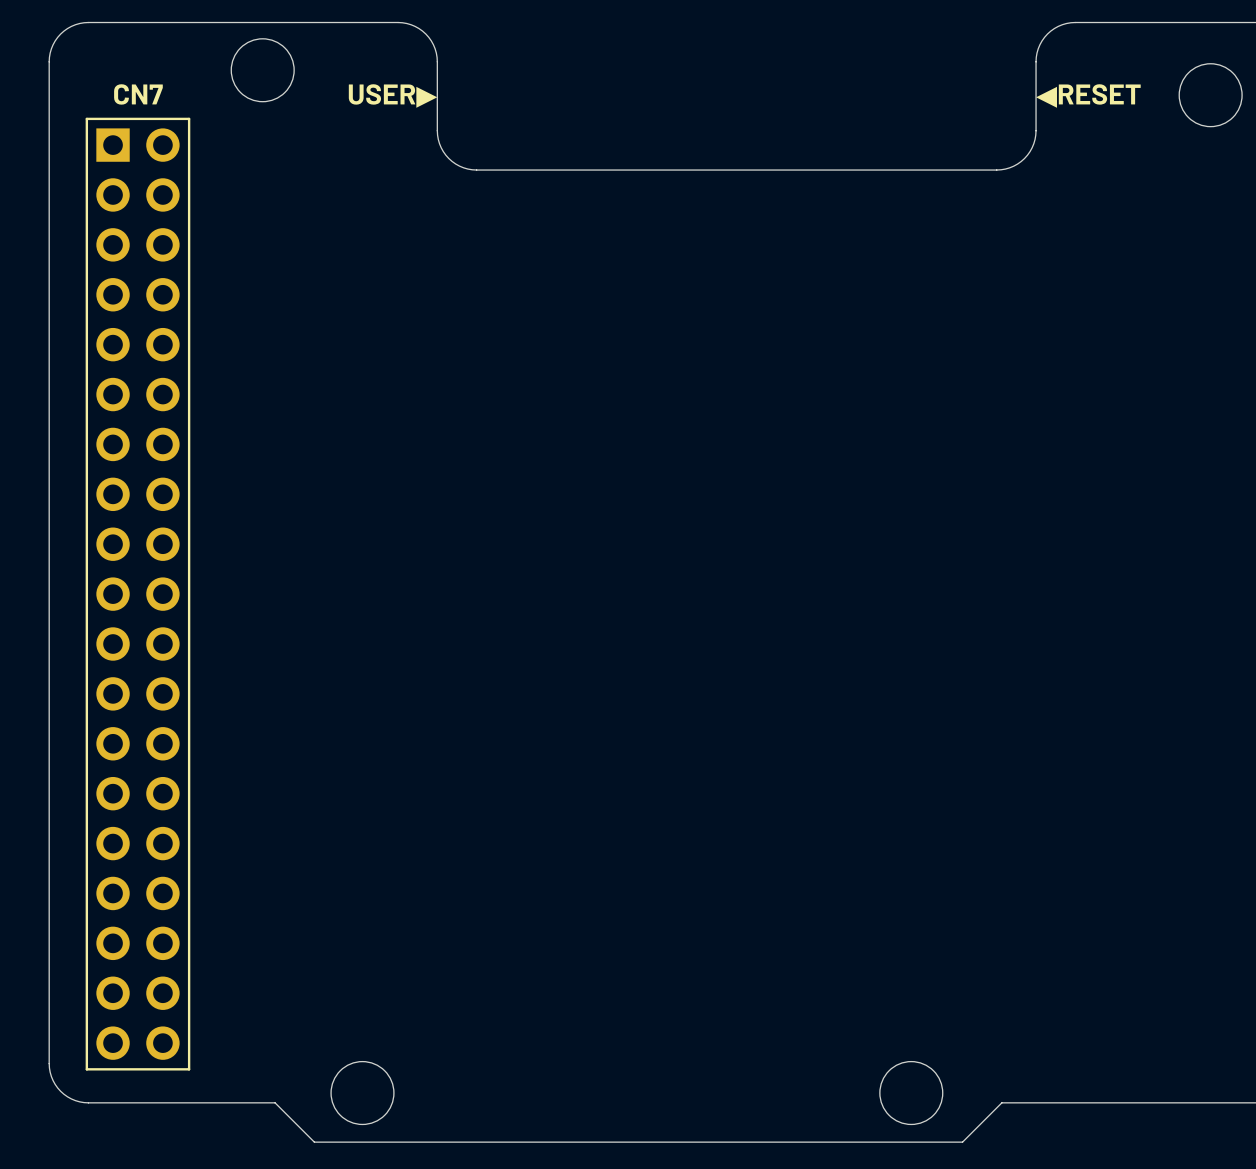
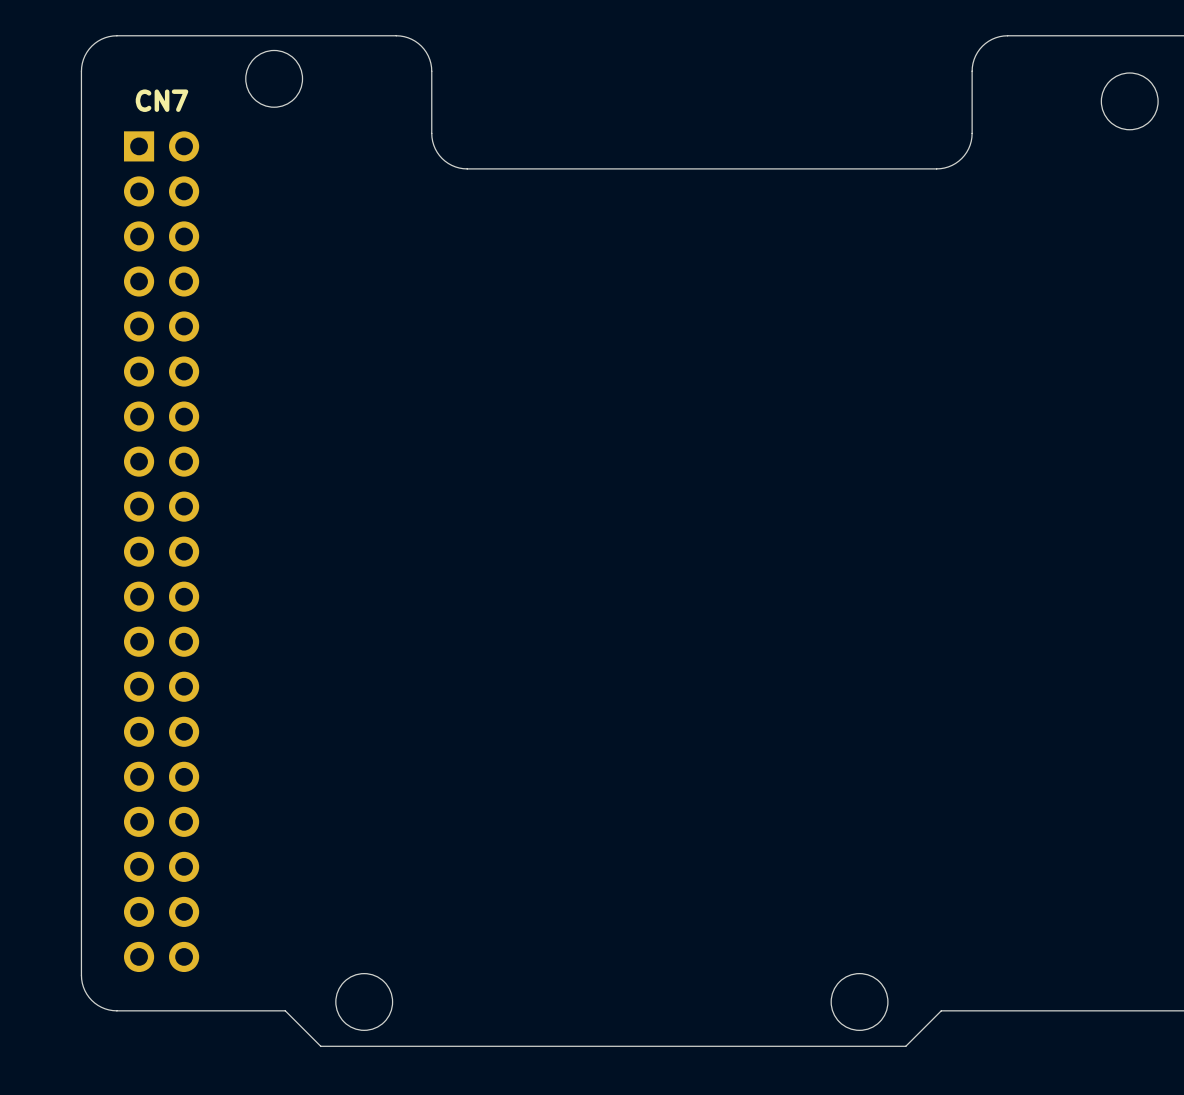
text: USER▶ (393, 96) -> none
text: ◀RESET (1088, 96) -> none
line: (86, 118) (189, 118) (189, 1069) (86, 1069) (86, 118) -> none

